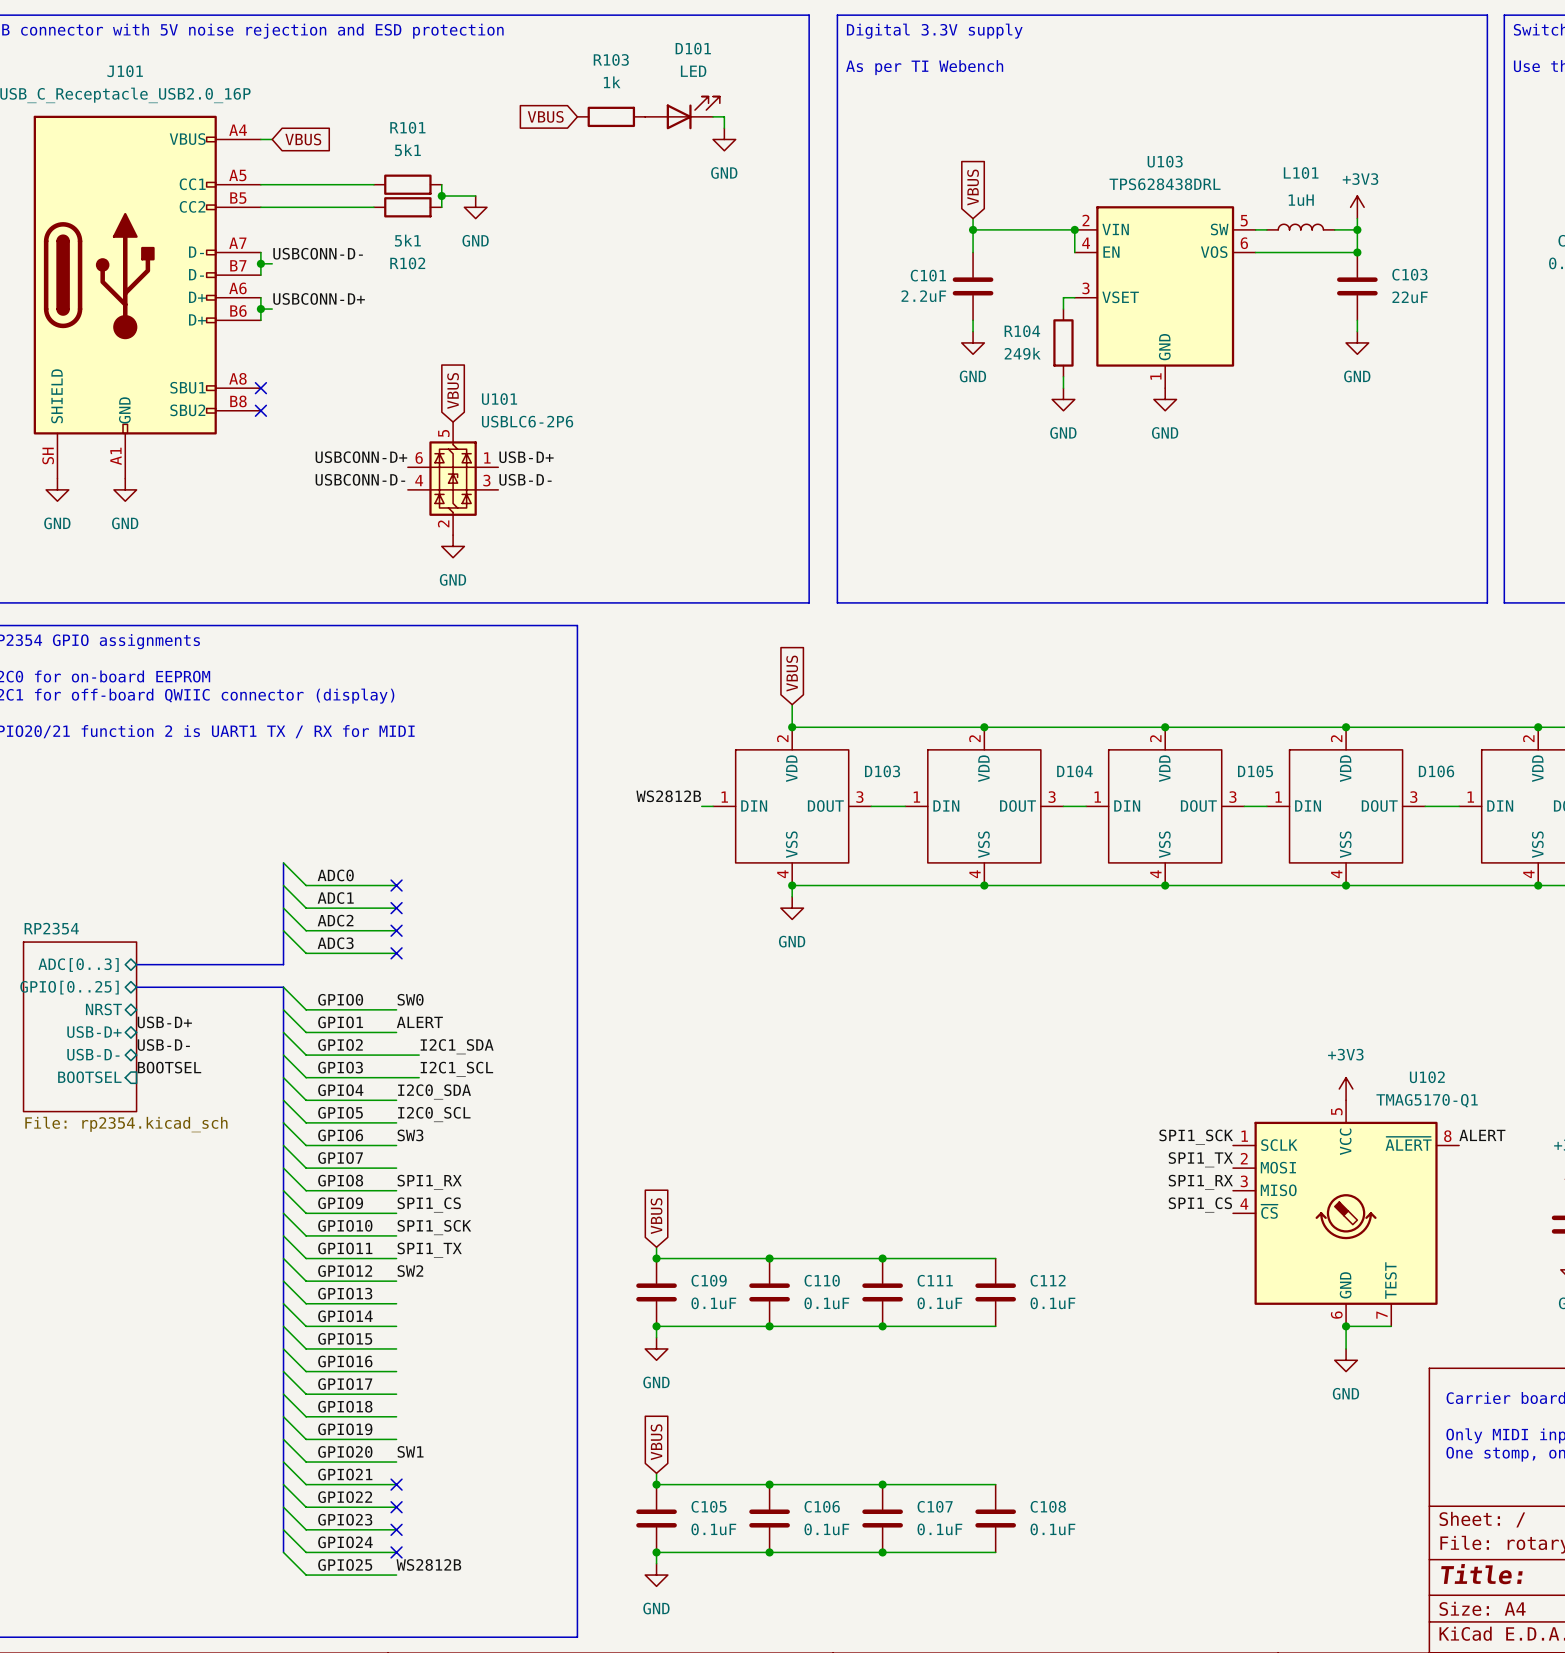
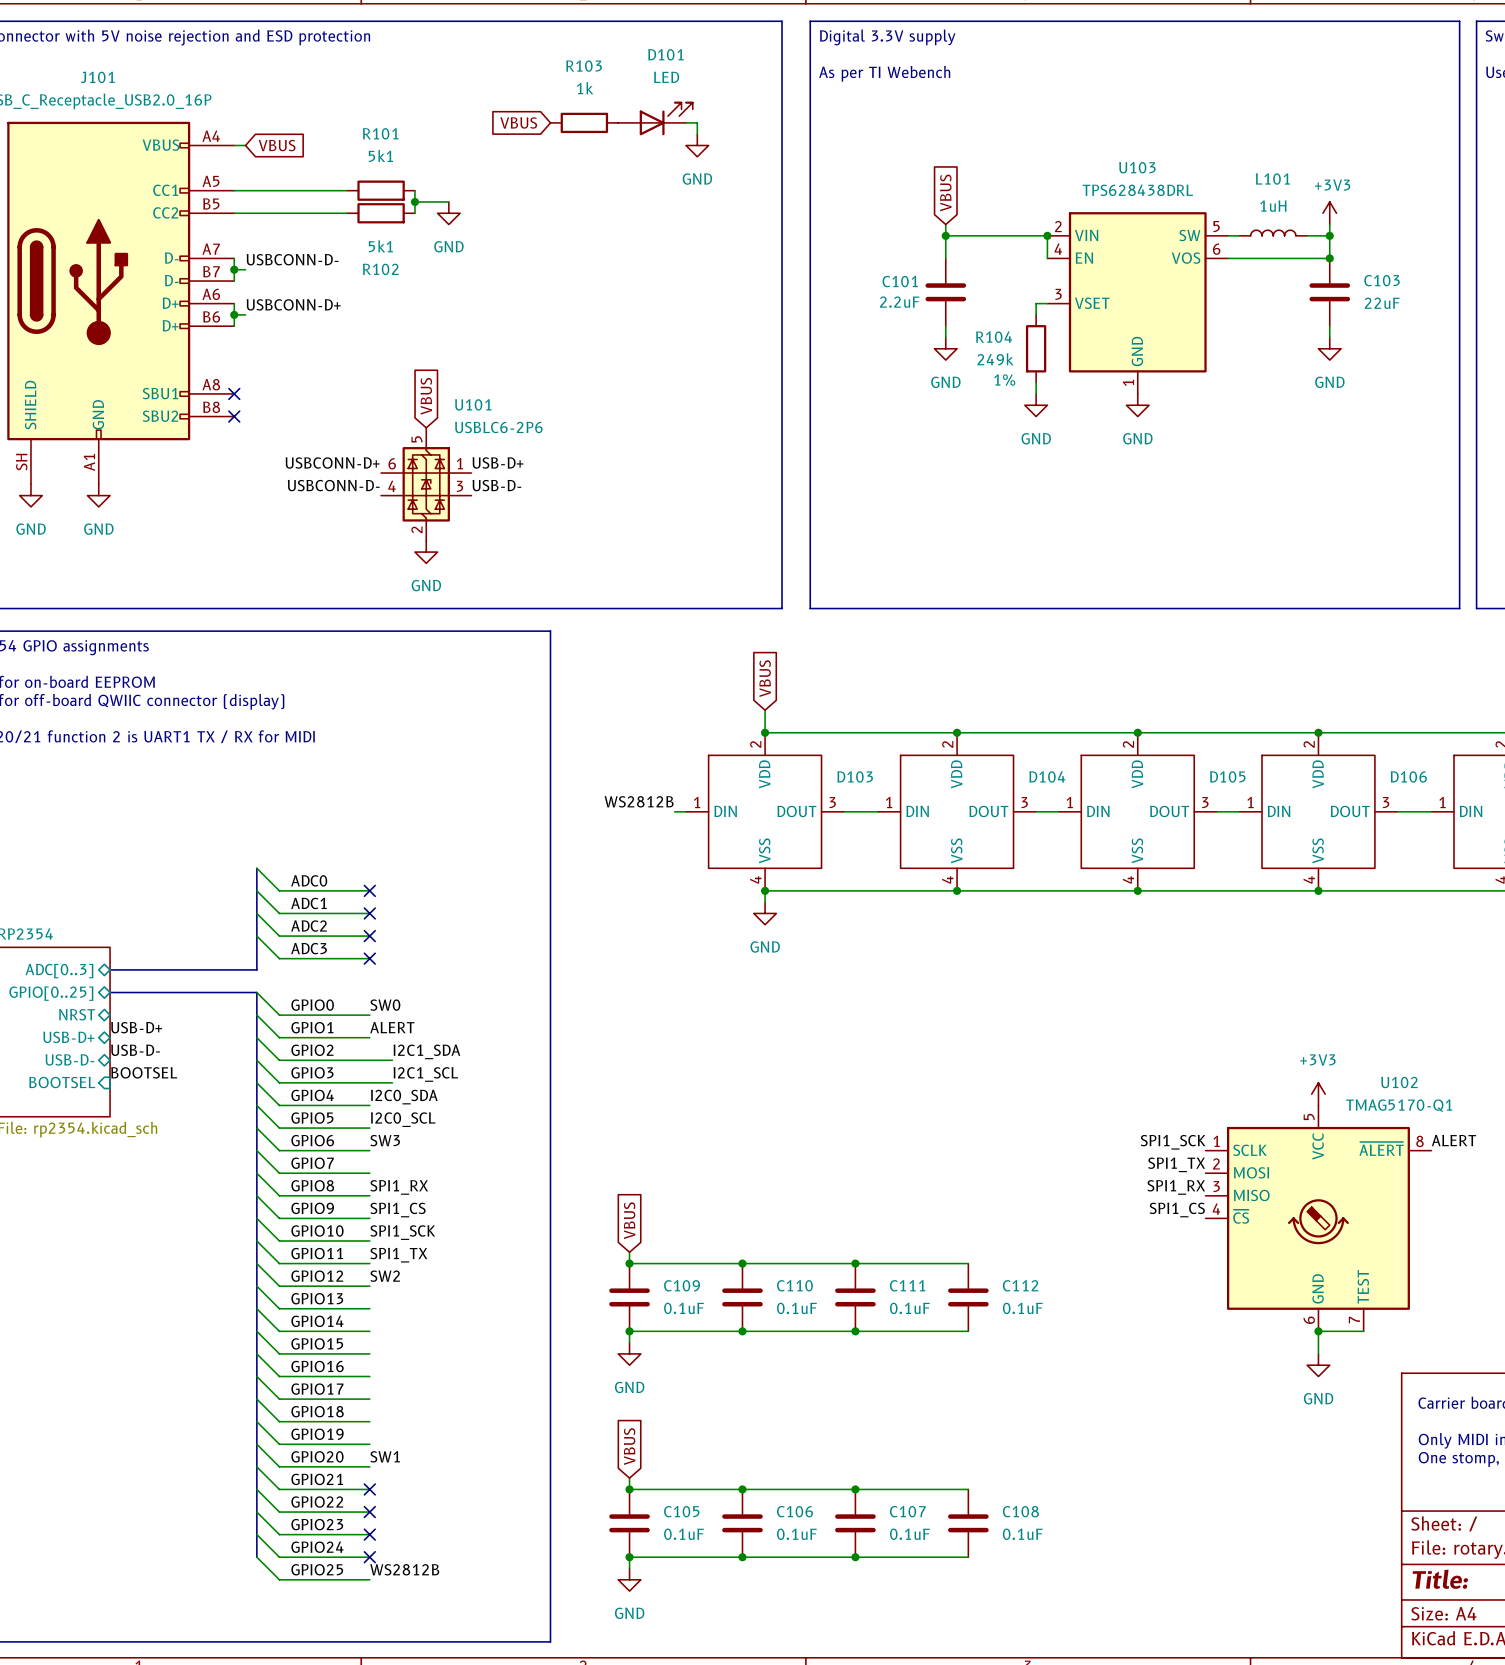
R104 text: none -> 1% (1004, 380)

